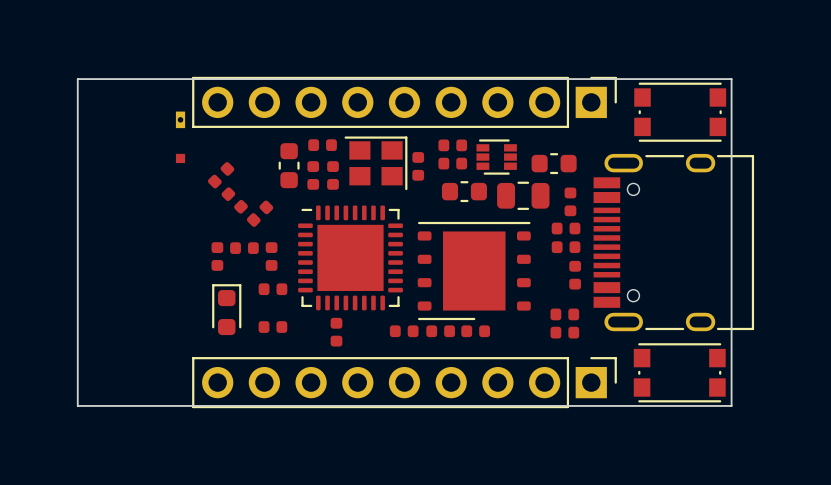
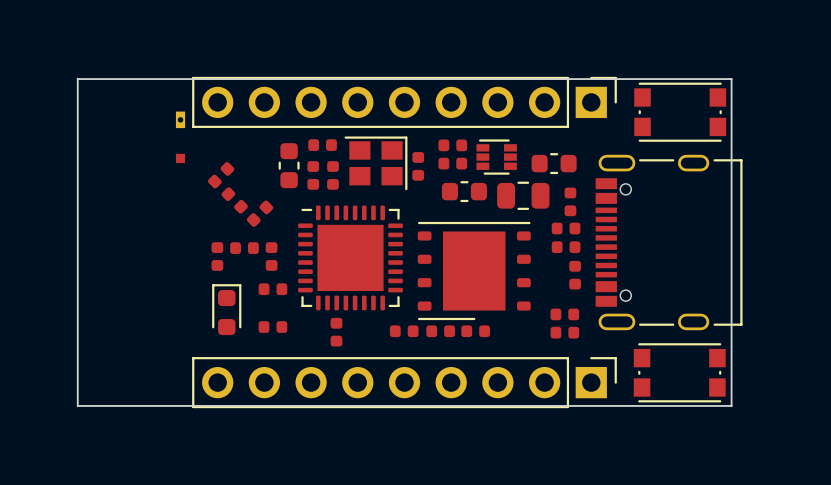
part footprint: [593, 153, 755, 332] -> [595, 154, 743, 331]

